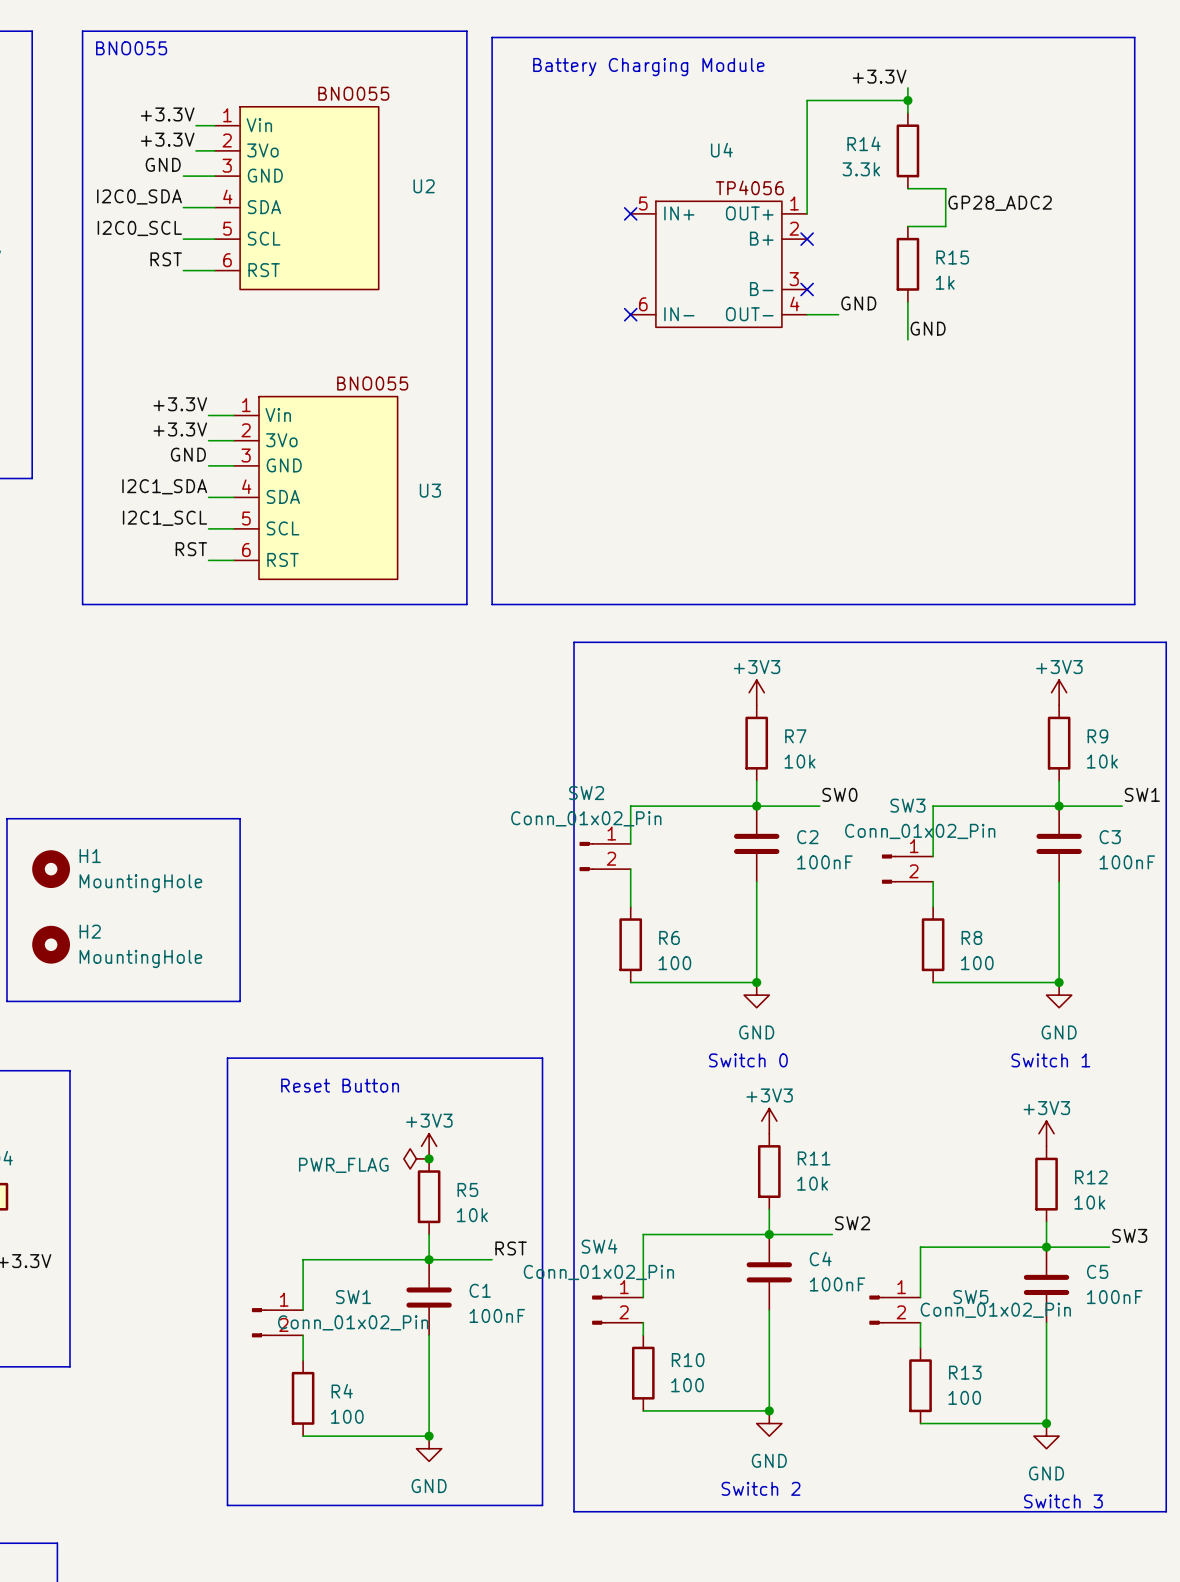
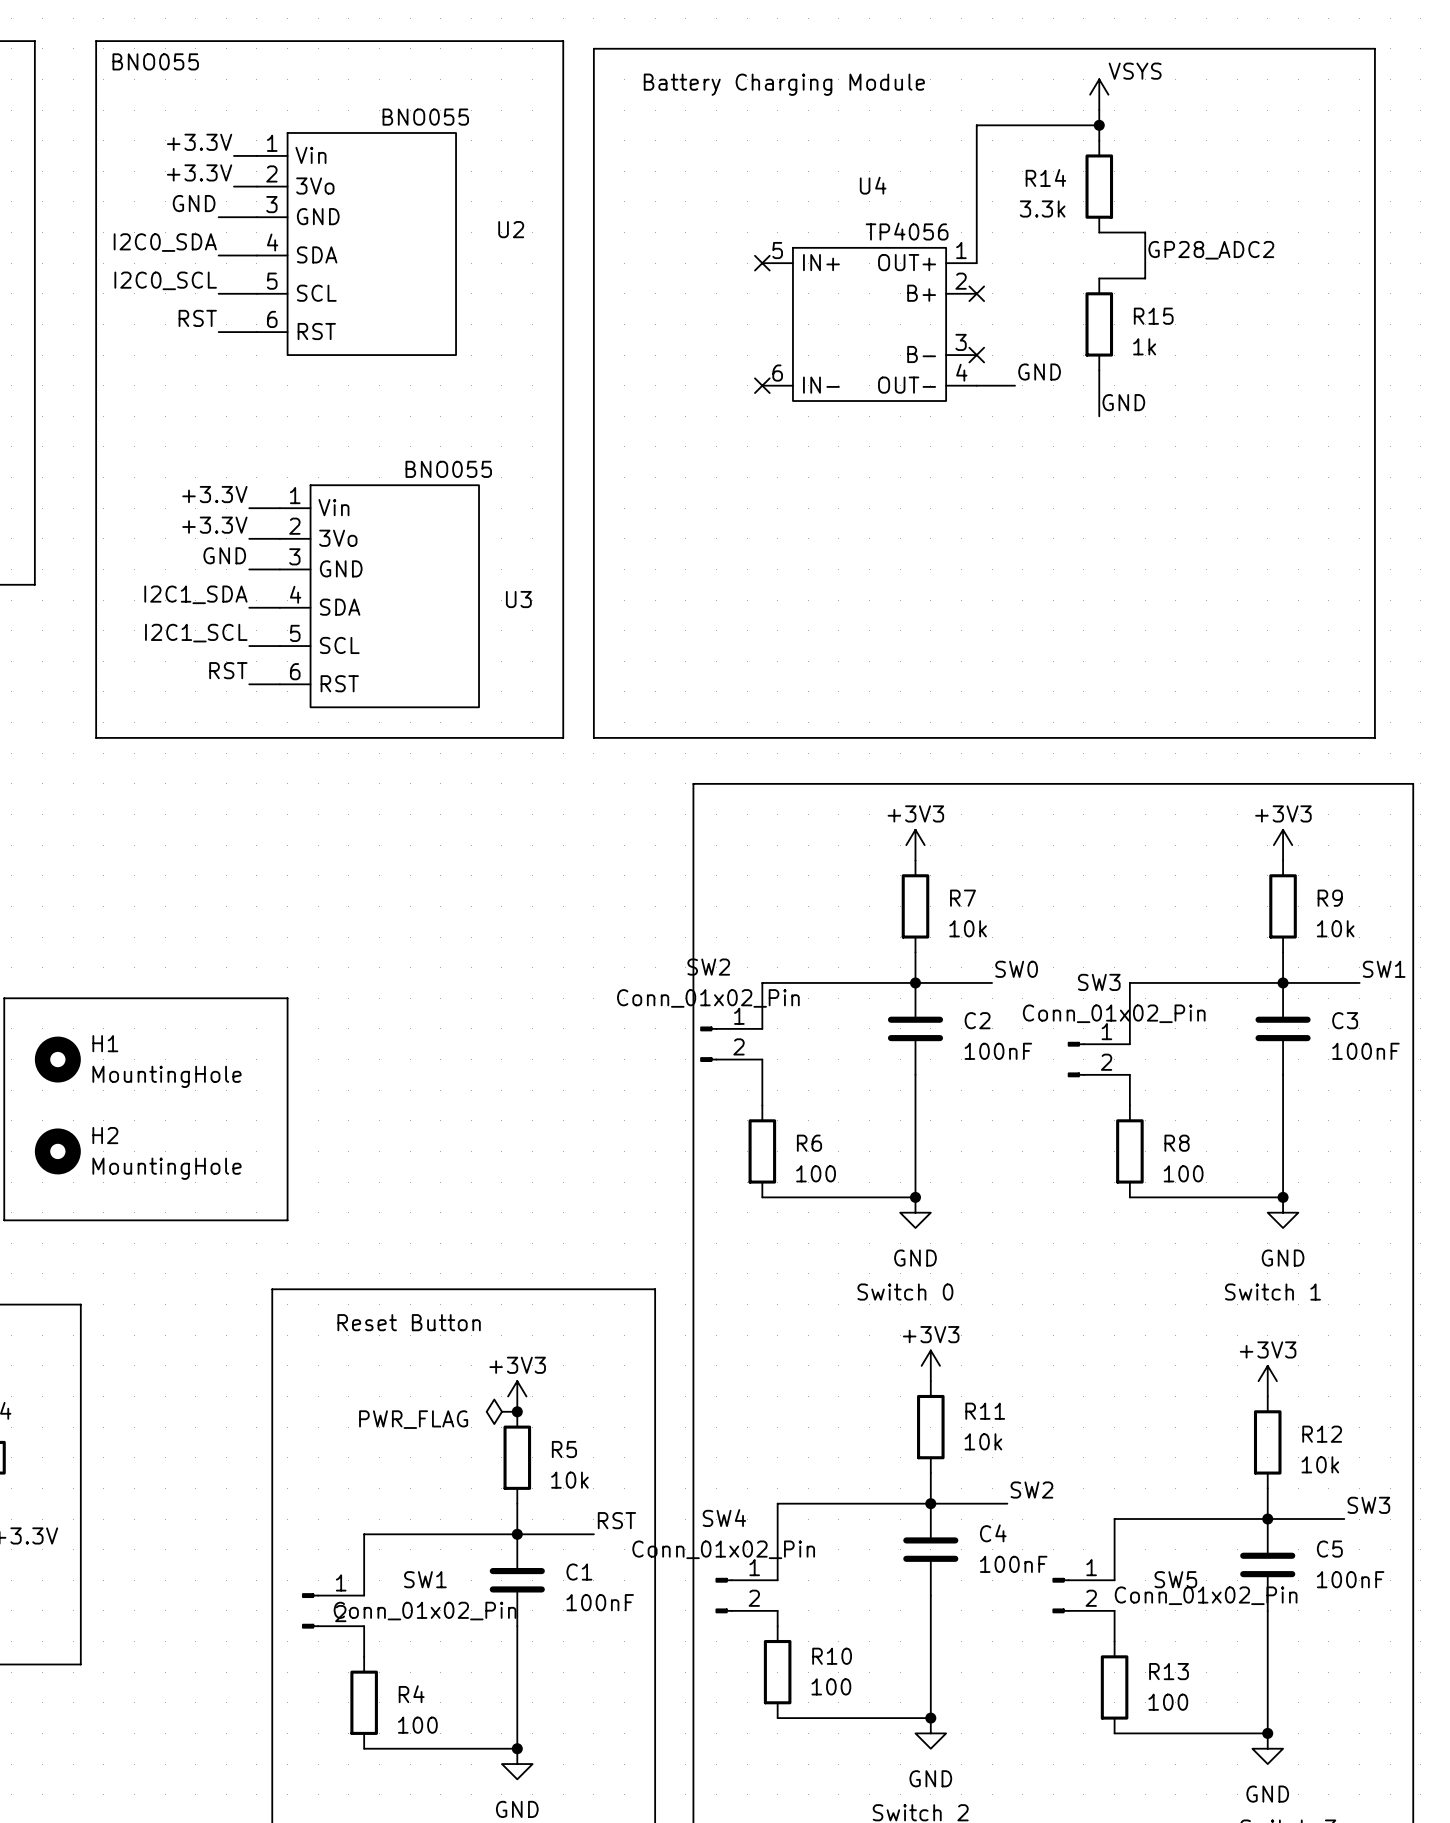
power symbol: none -> VSYS (1099, 94)
label: +3.3V (879, 76) -> none

